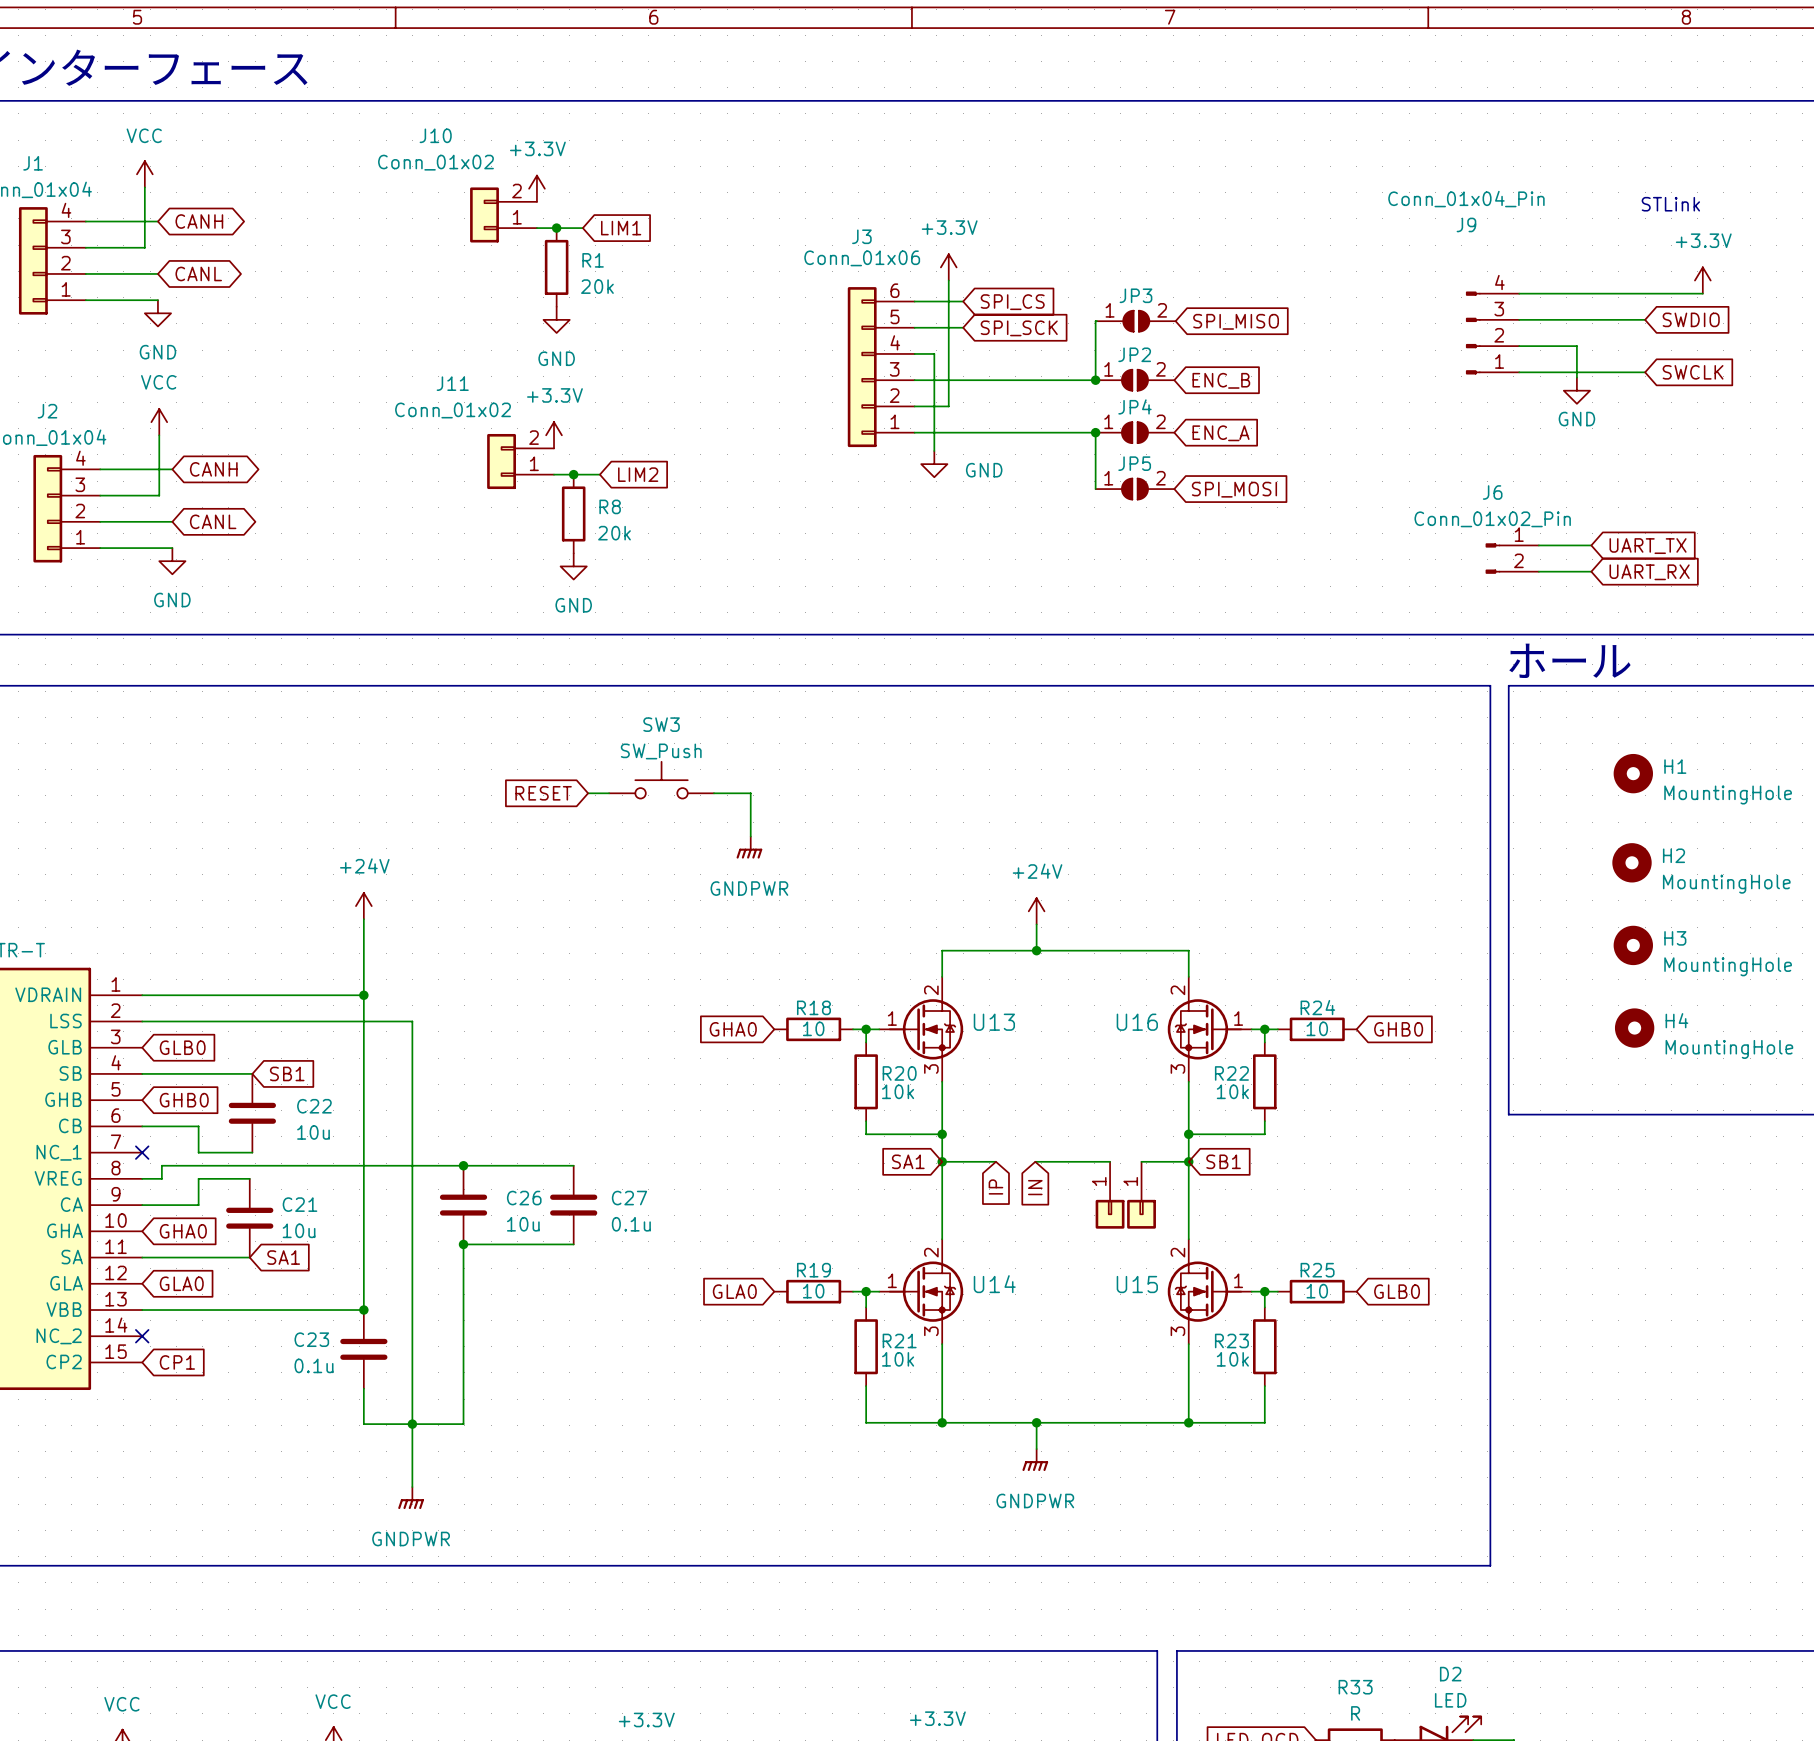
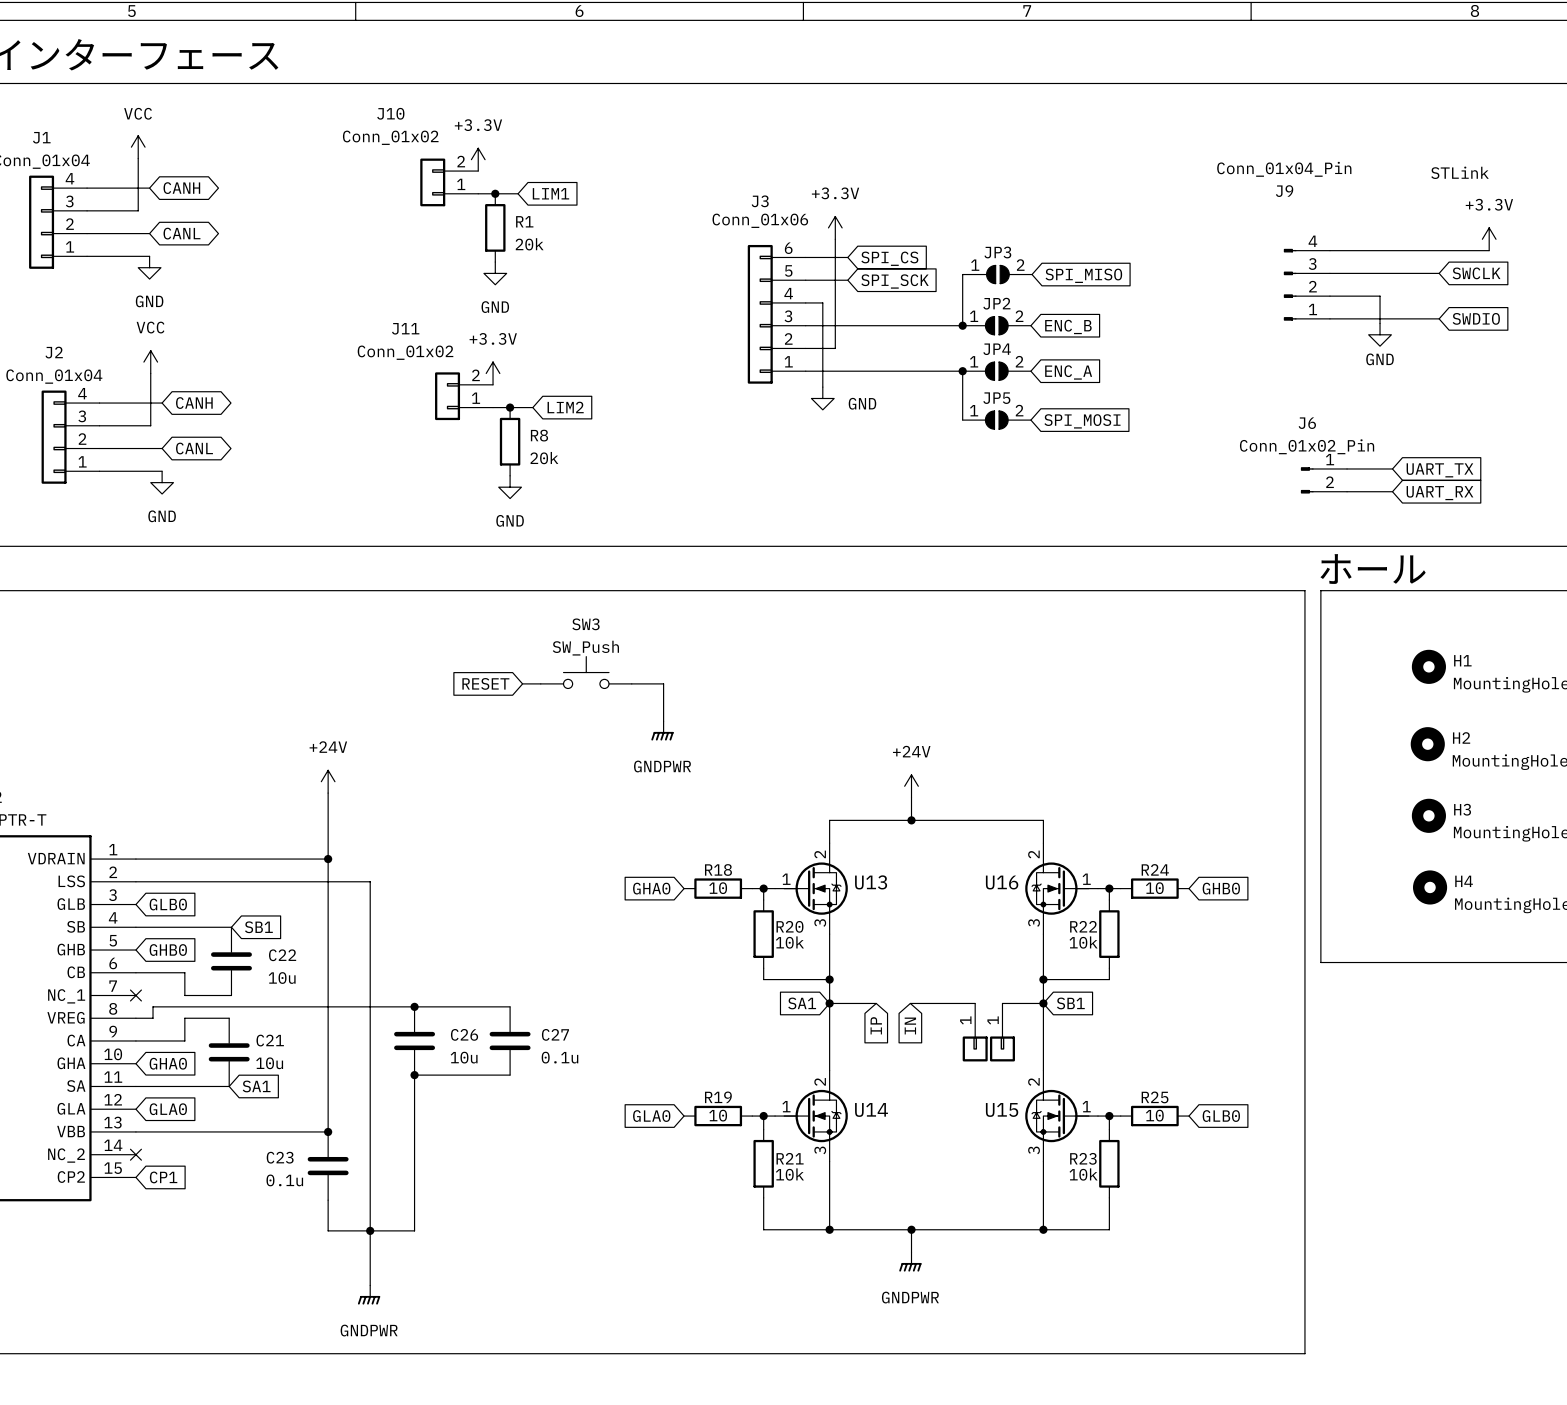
global label: SWDIO (1691, 319) -> SWCLK (1476, 273)
global label: SWCLK (1693, 372) -> SWDIO (1476, 318)

